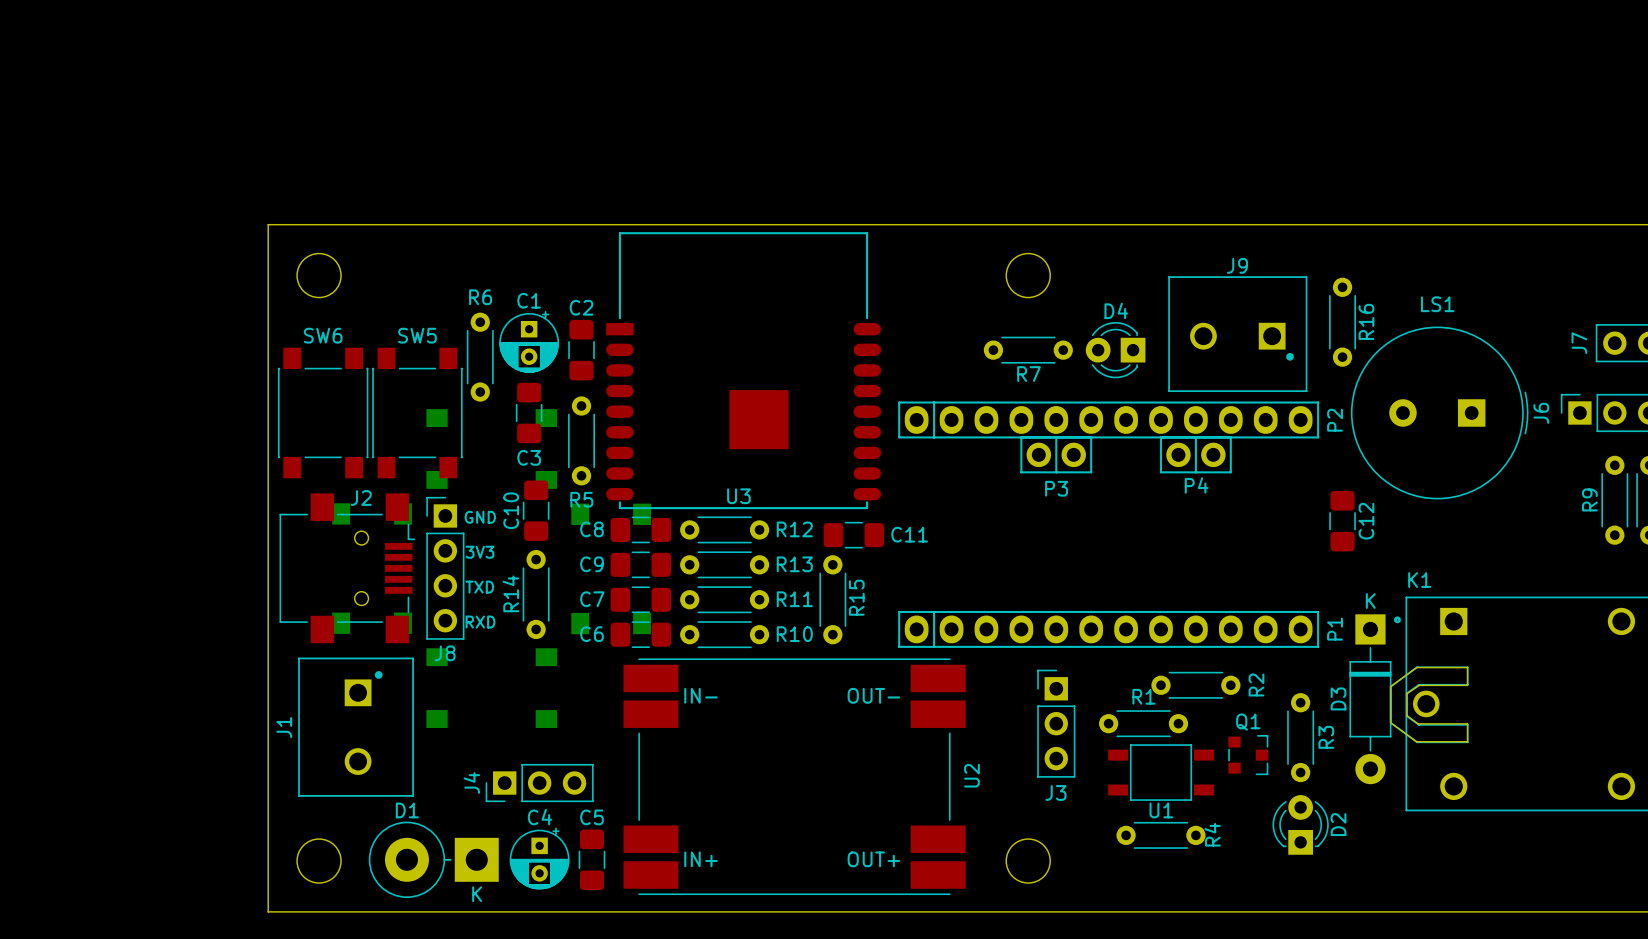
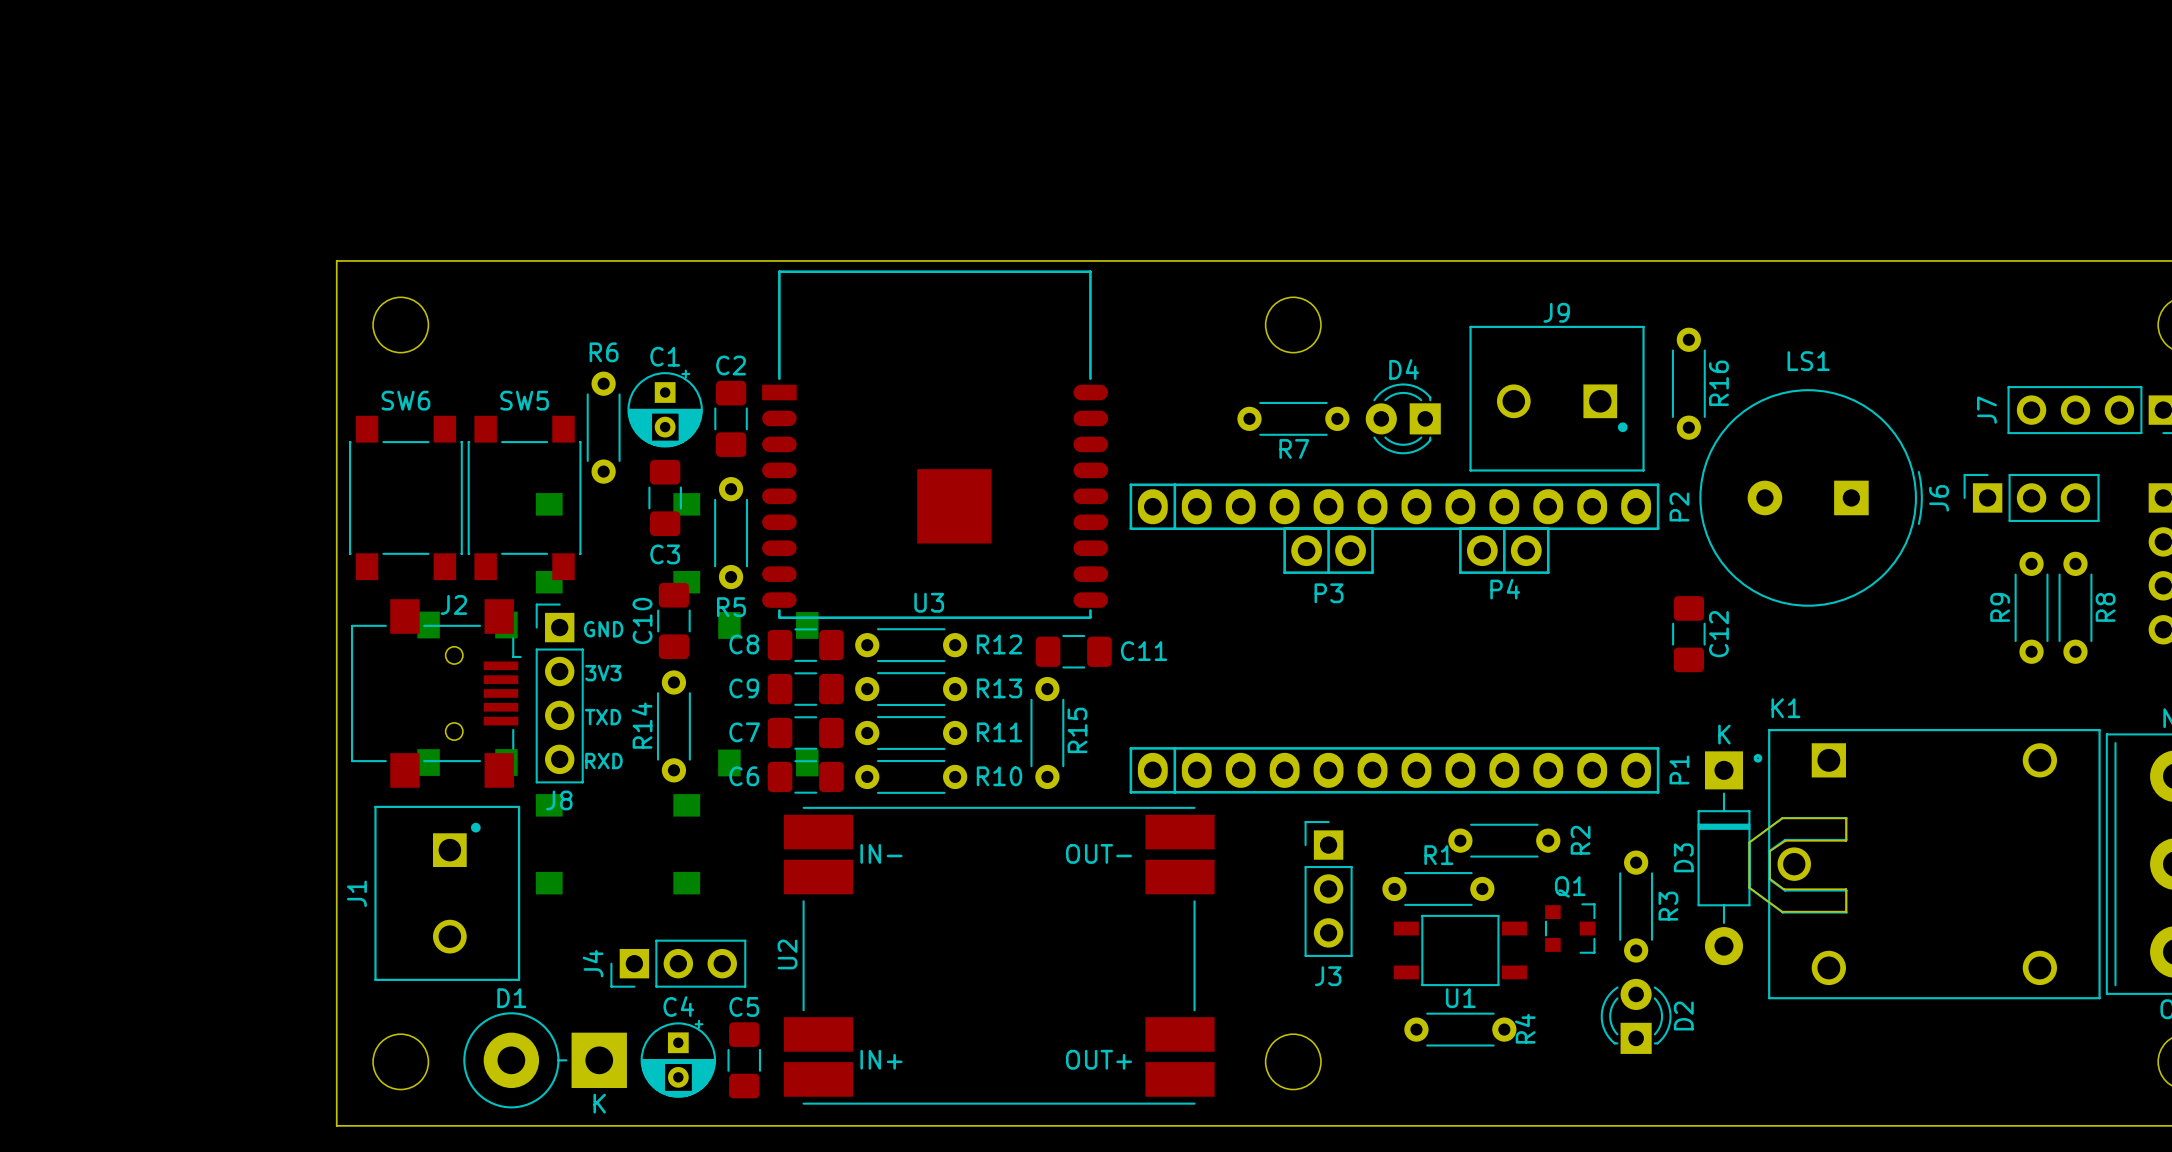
U2 name position: U2 (971, 775) -> U2 (787, 954)

